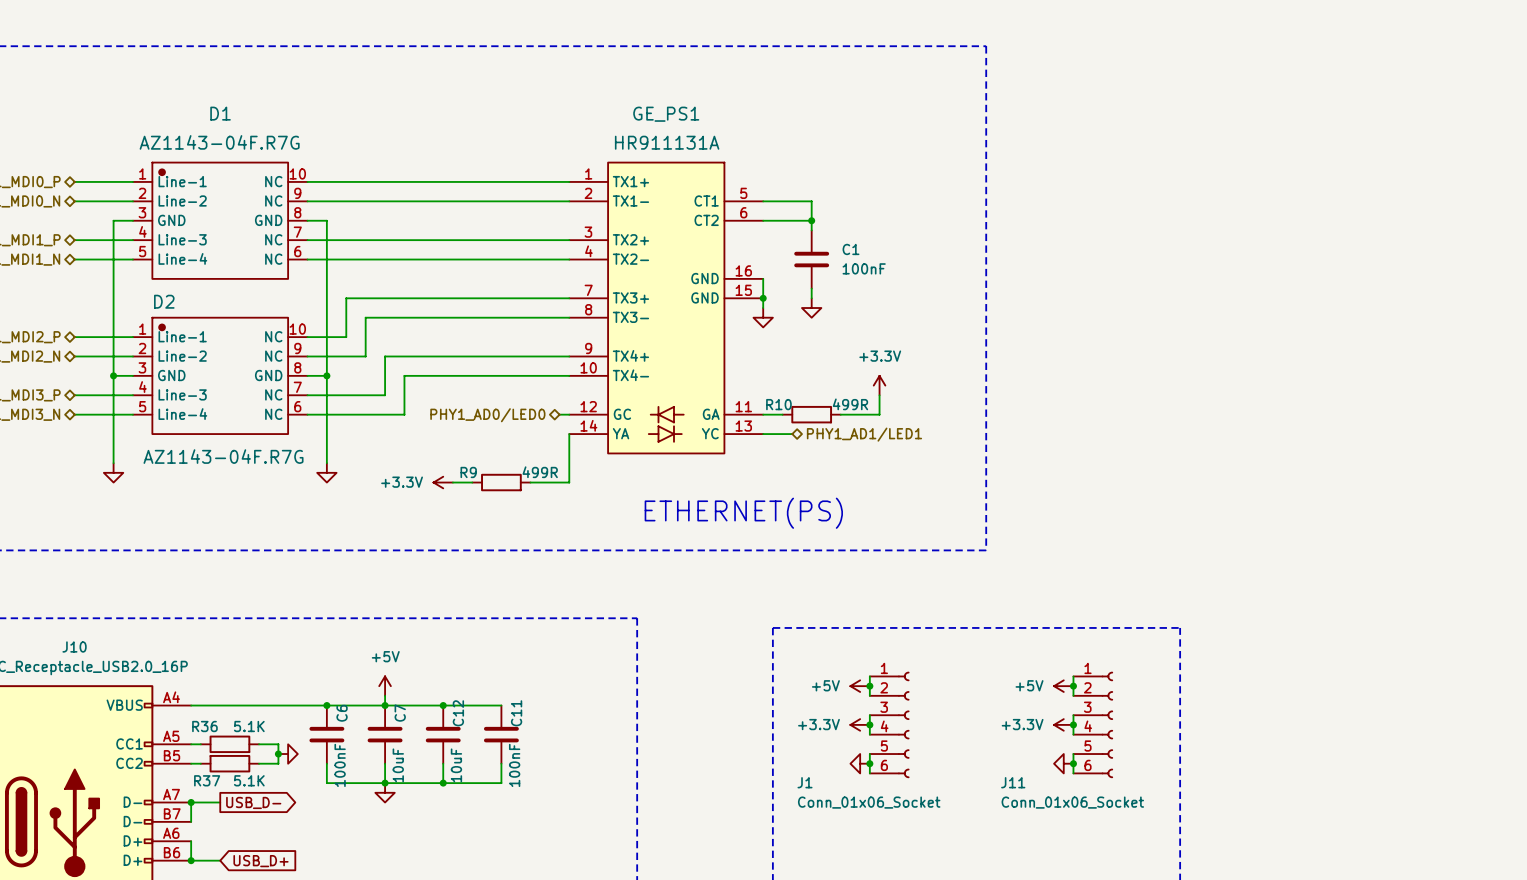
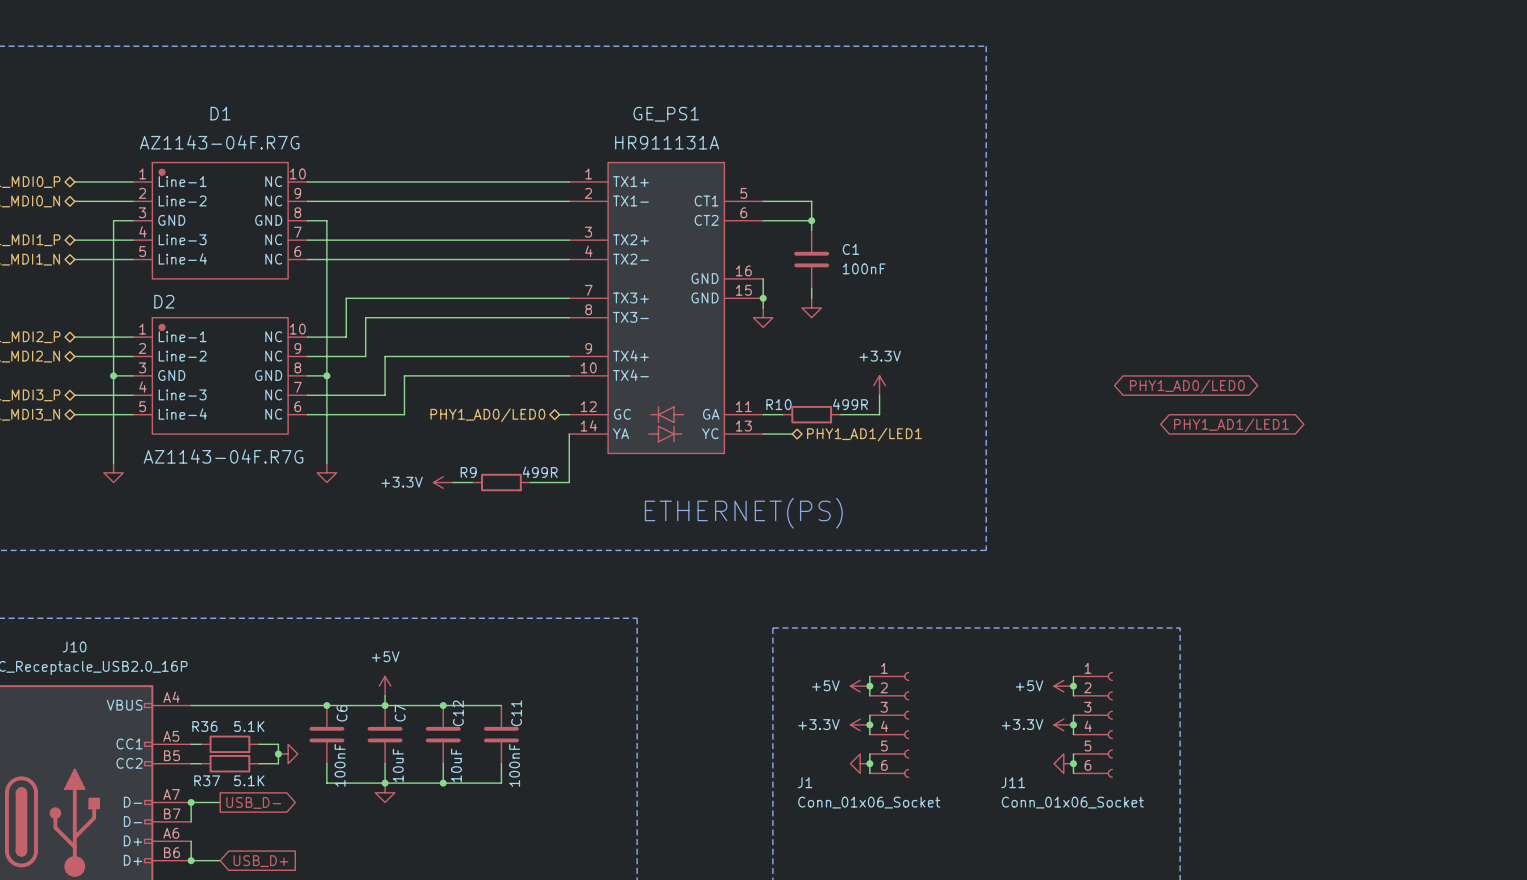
global label: none -> PHY1_AD0/LED0 (1187, 386)
global label: none -> PHY1_AD1/LED1 (1231, 425)

